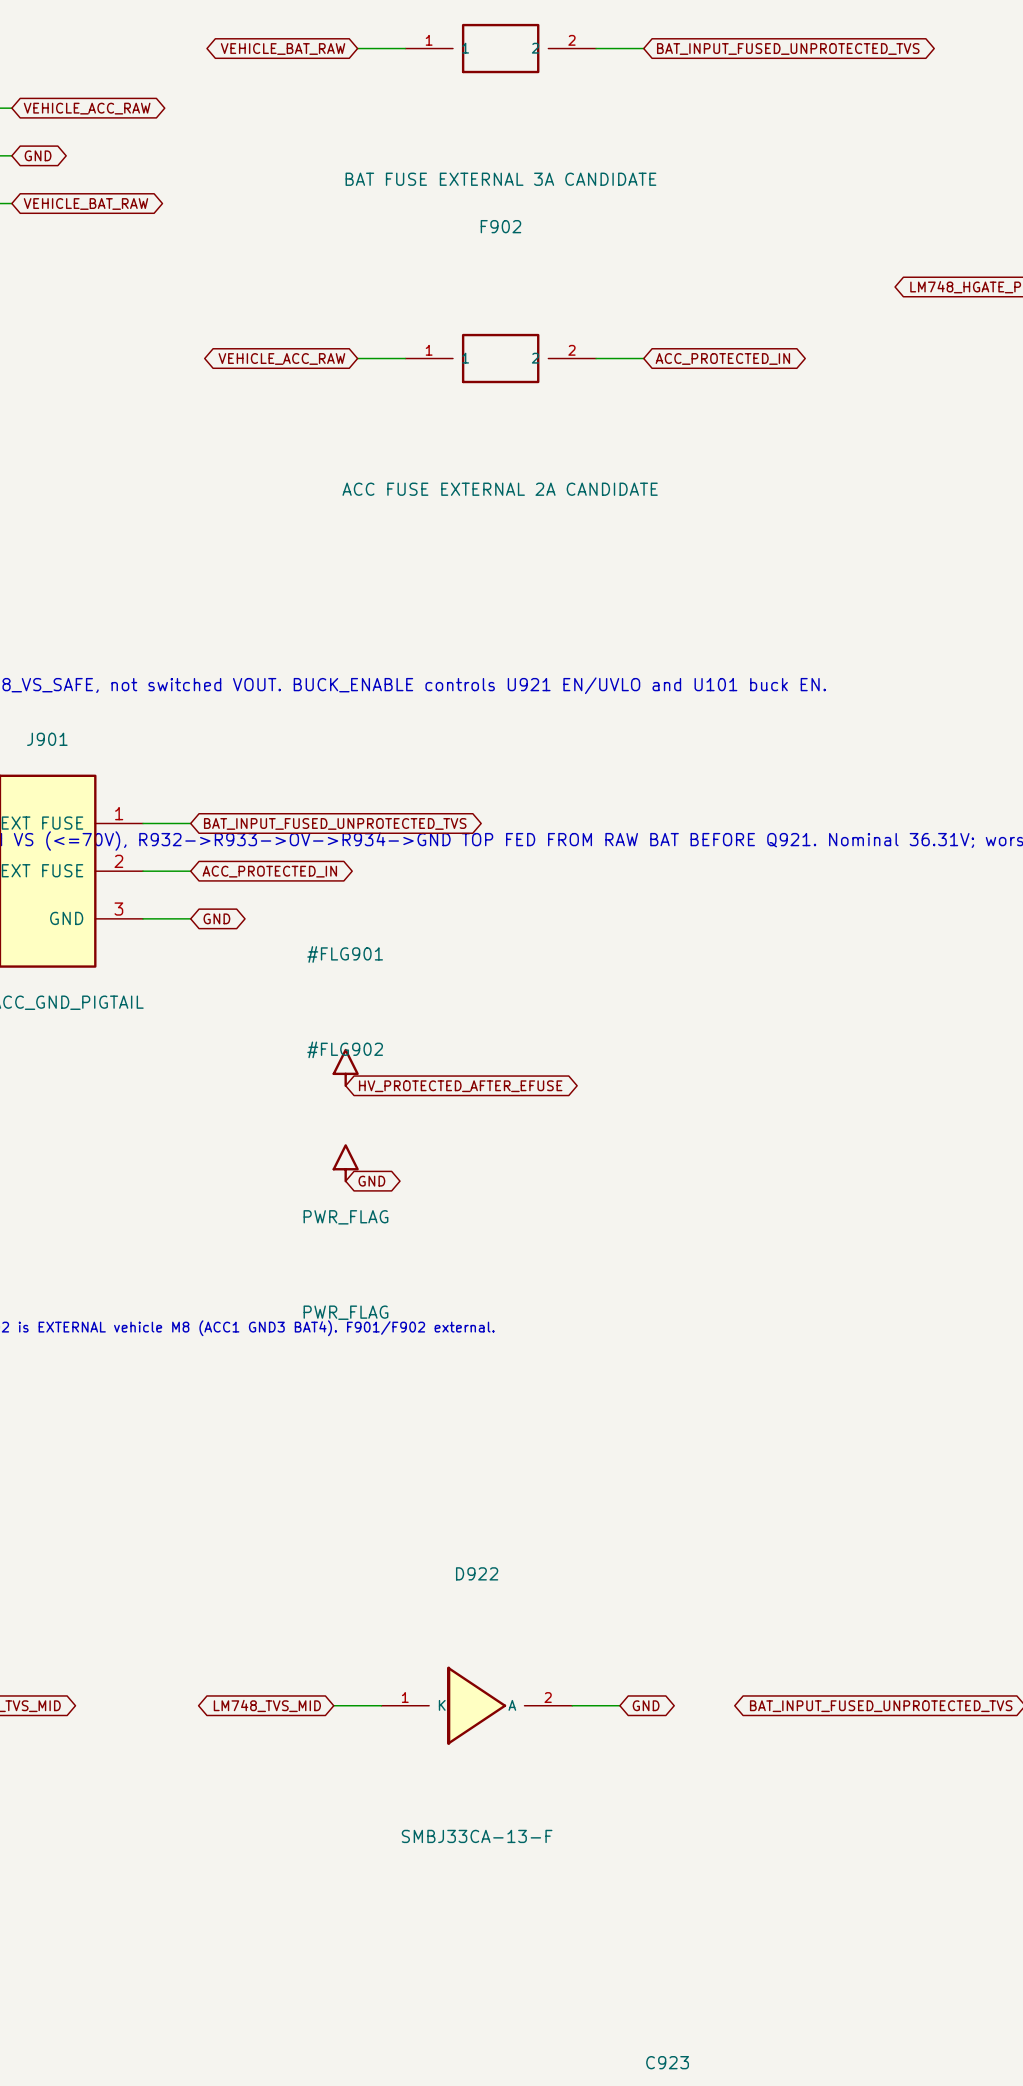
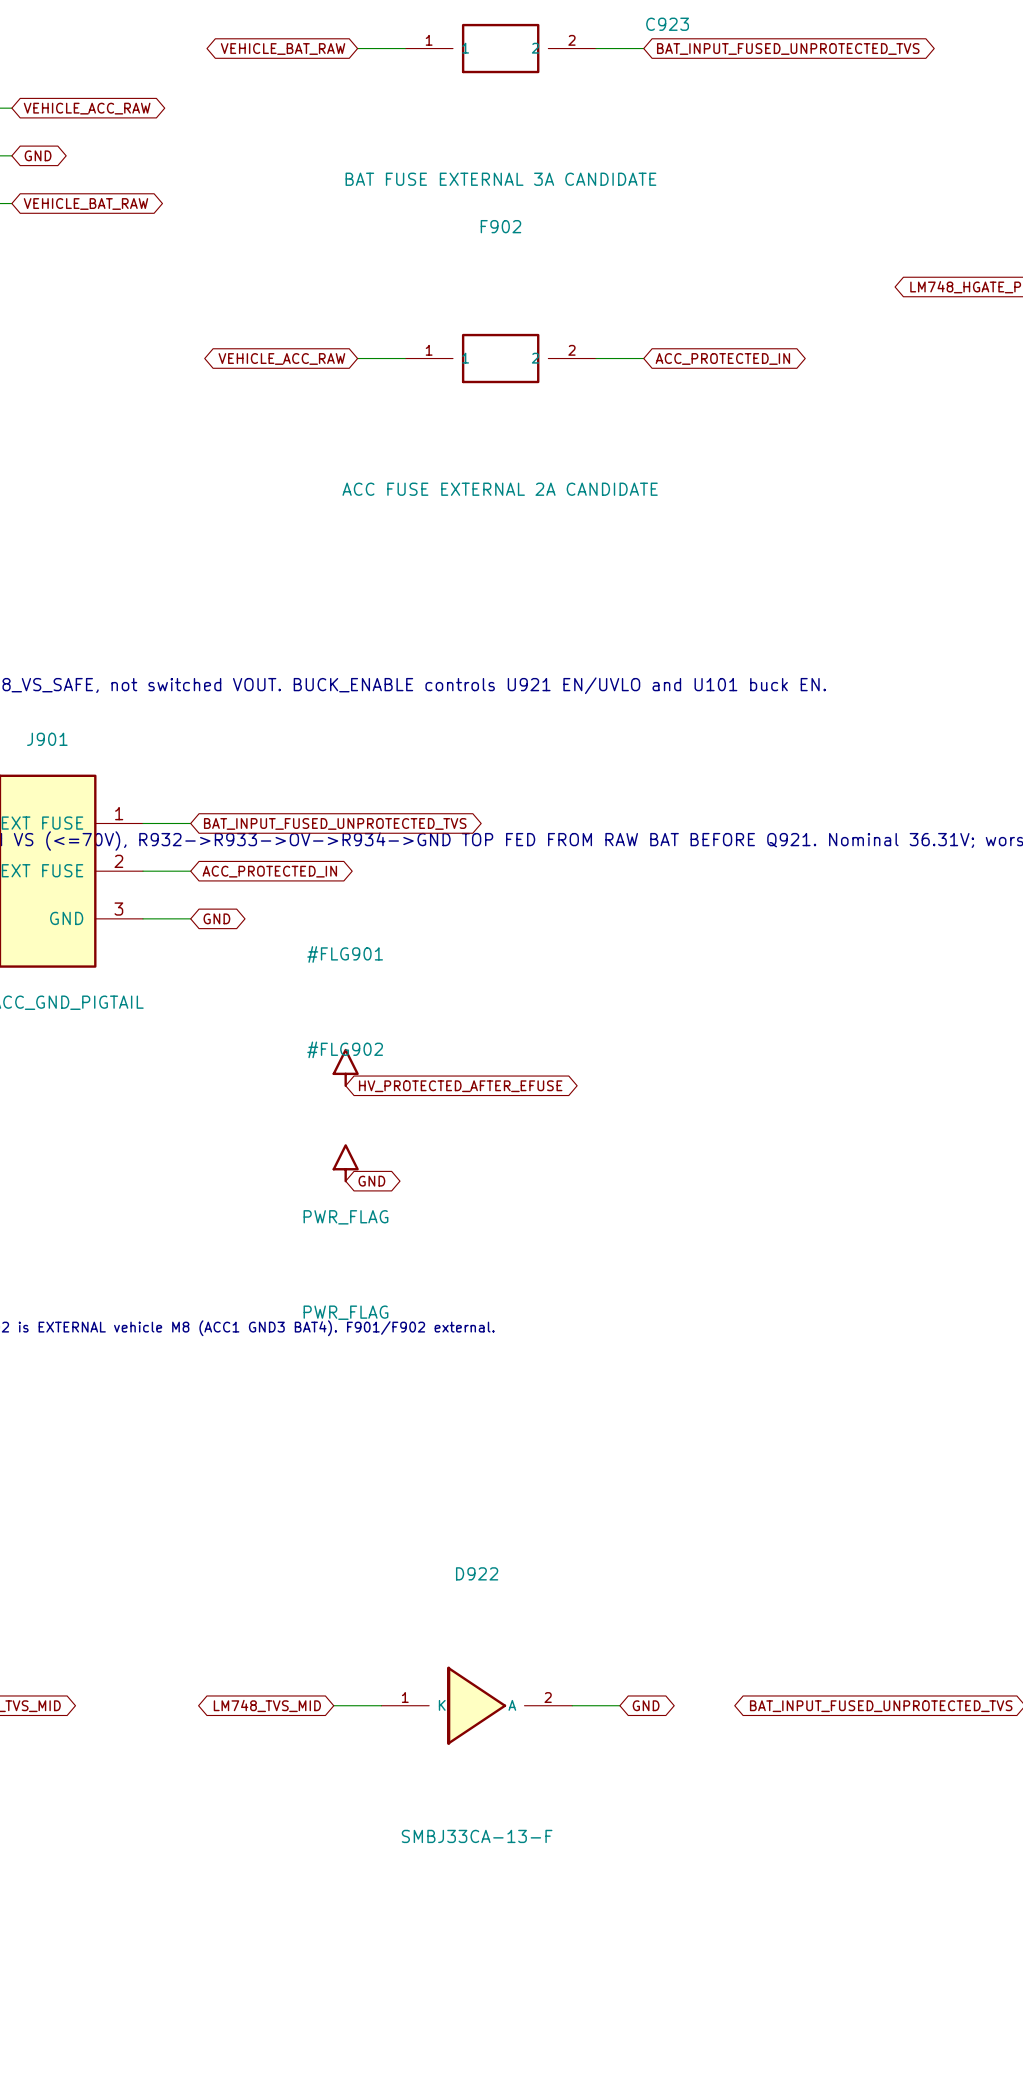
C923 name position: C923 (667, 2062) -> C923 (667, 24)

